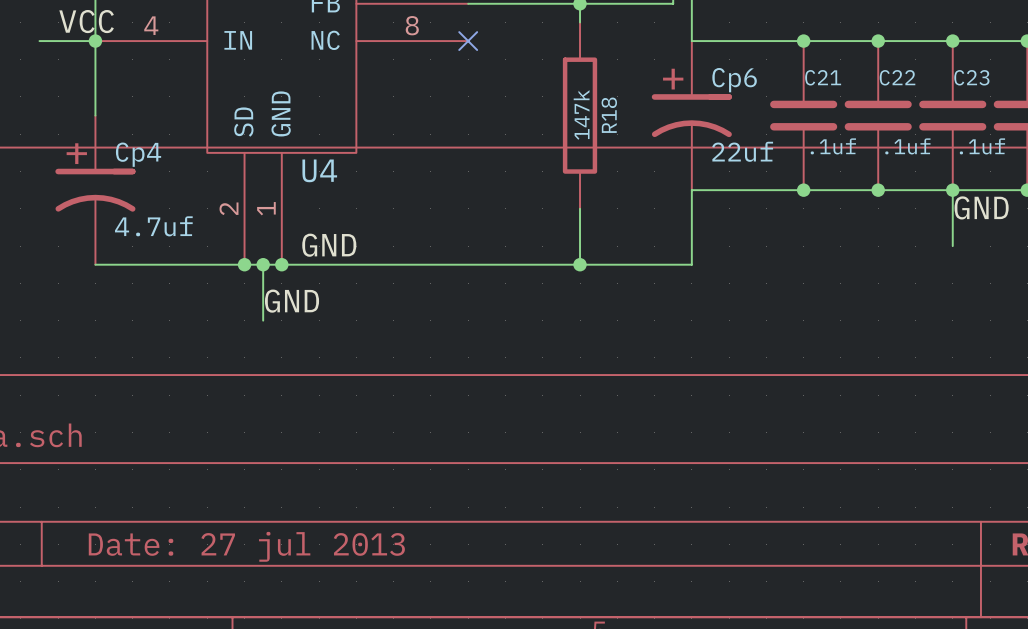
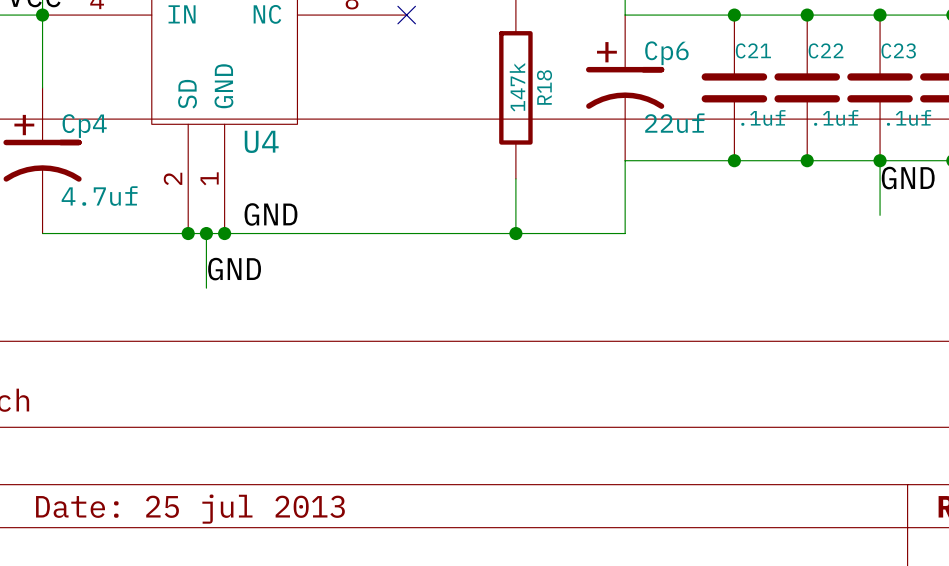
title block: Date: 27 jul 2013 (246, 546) -> Date: 25 jul 2013 (190, 509)

